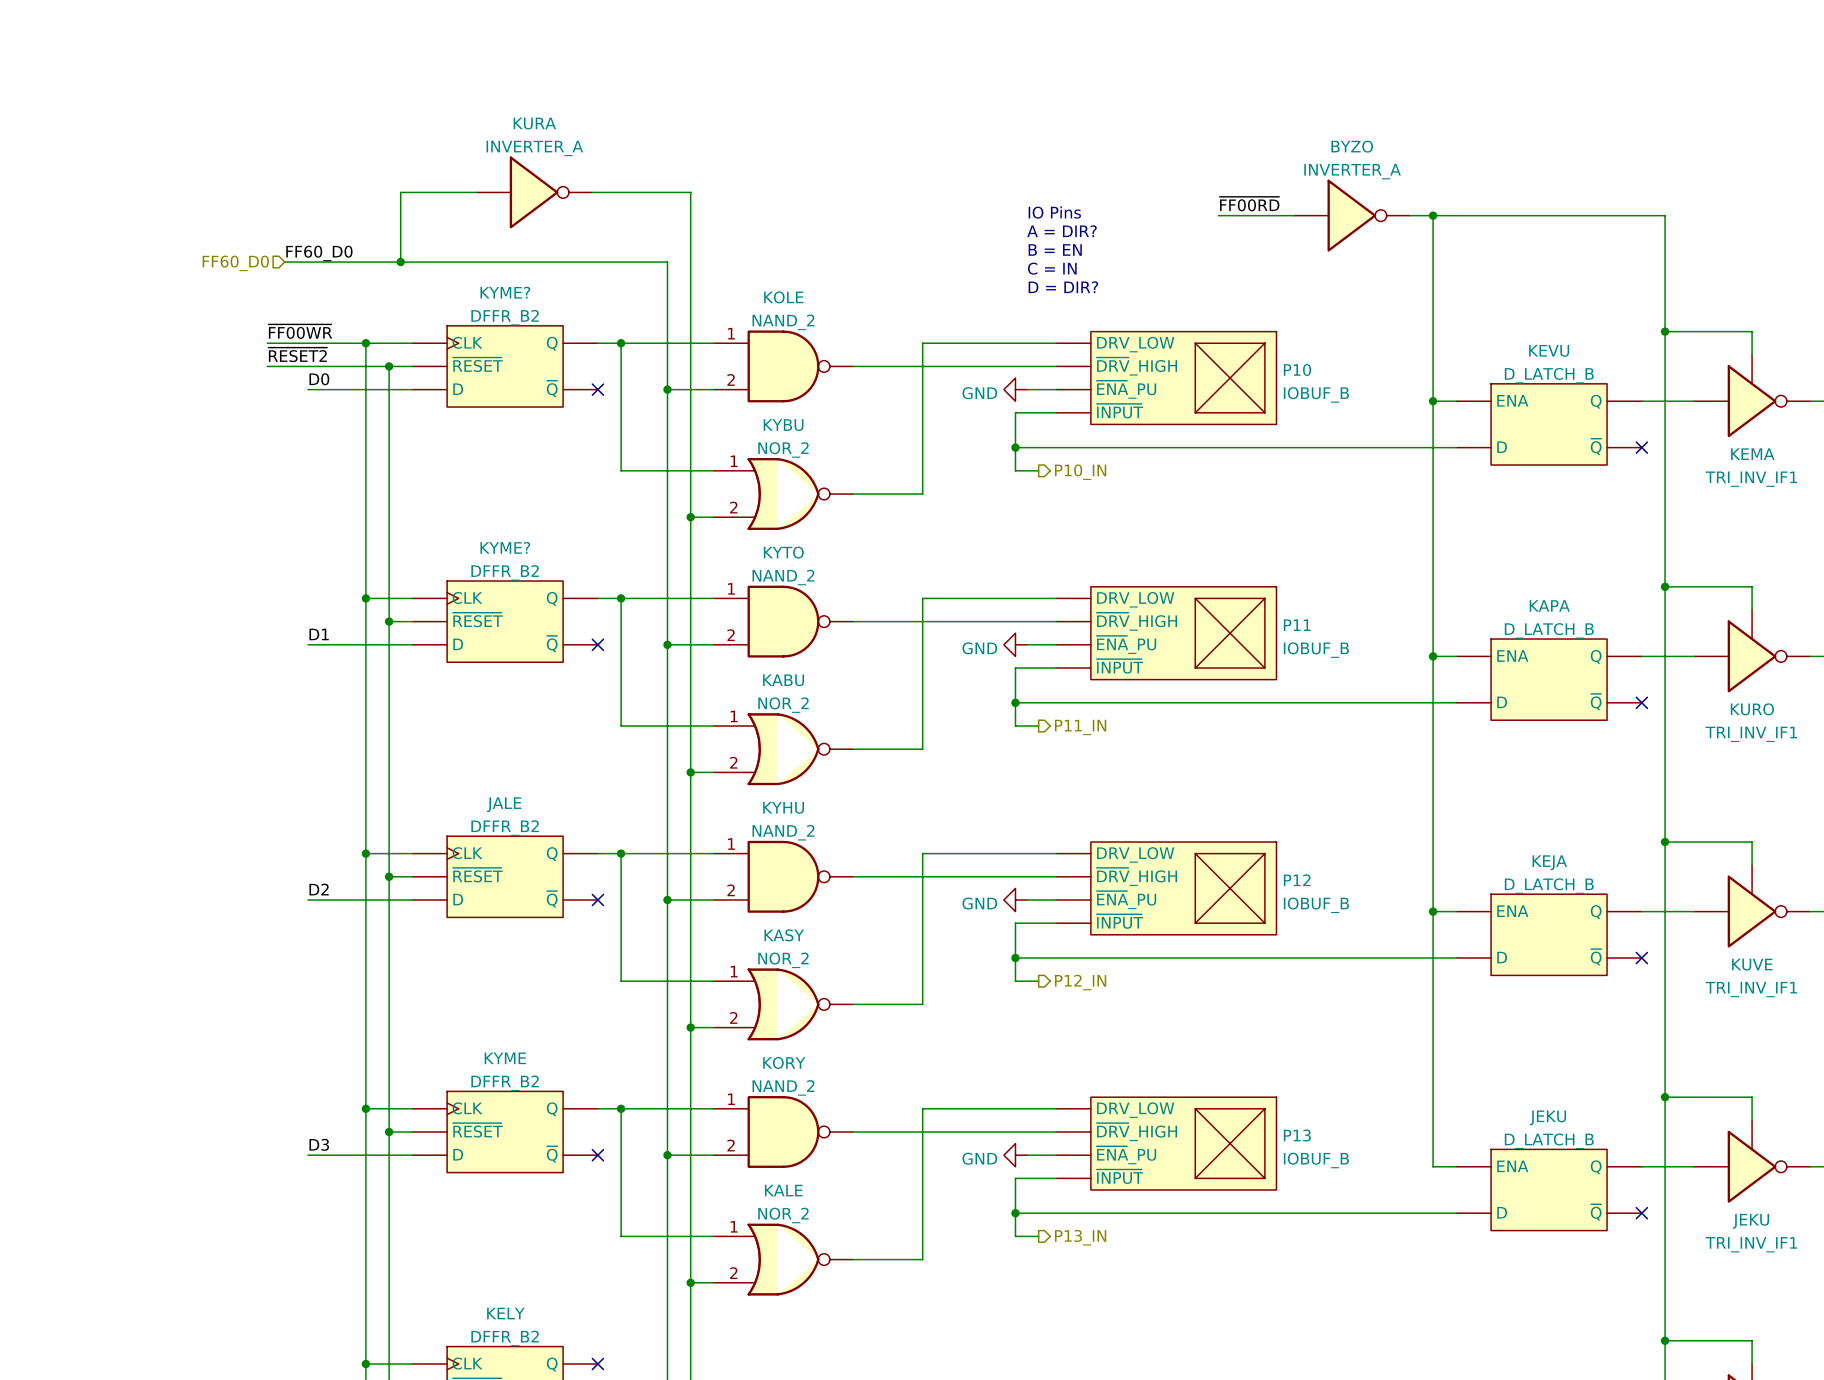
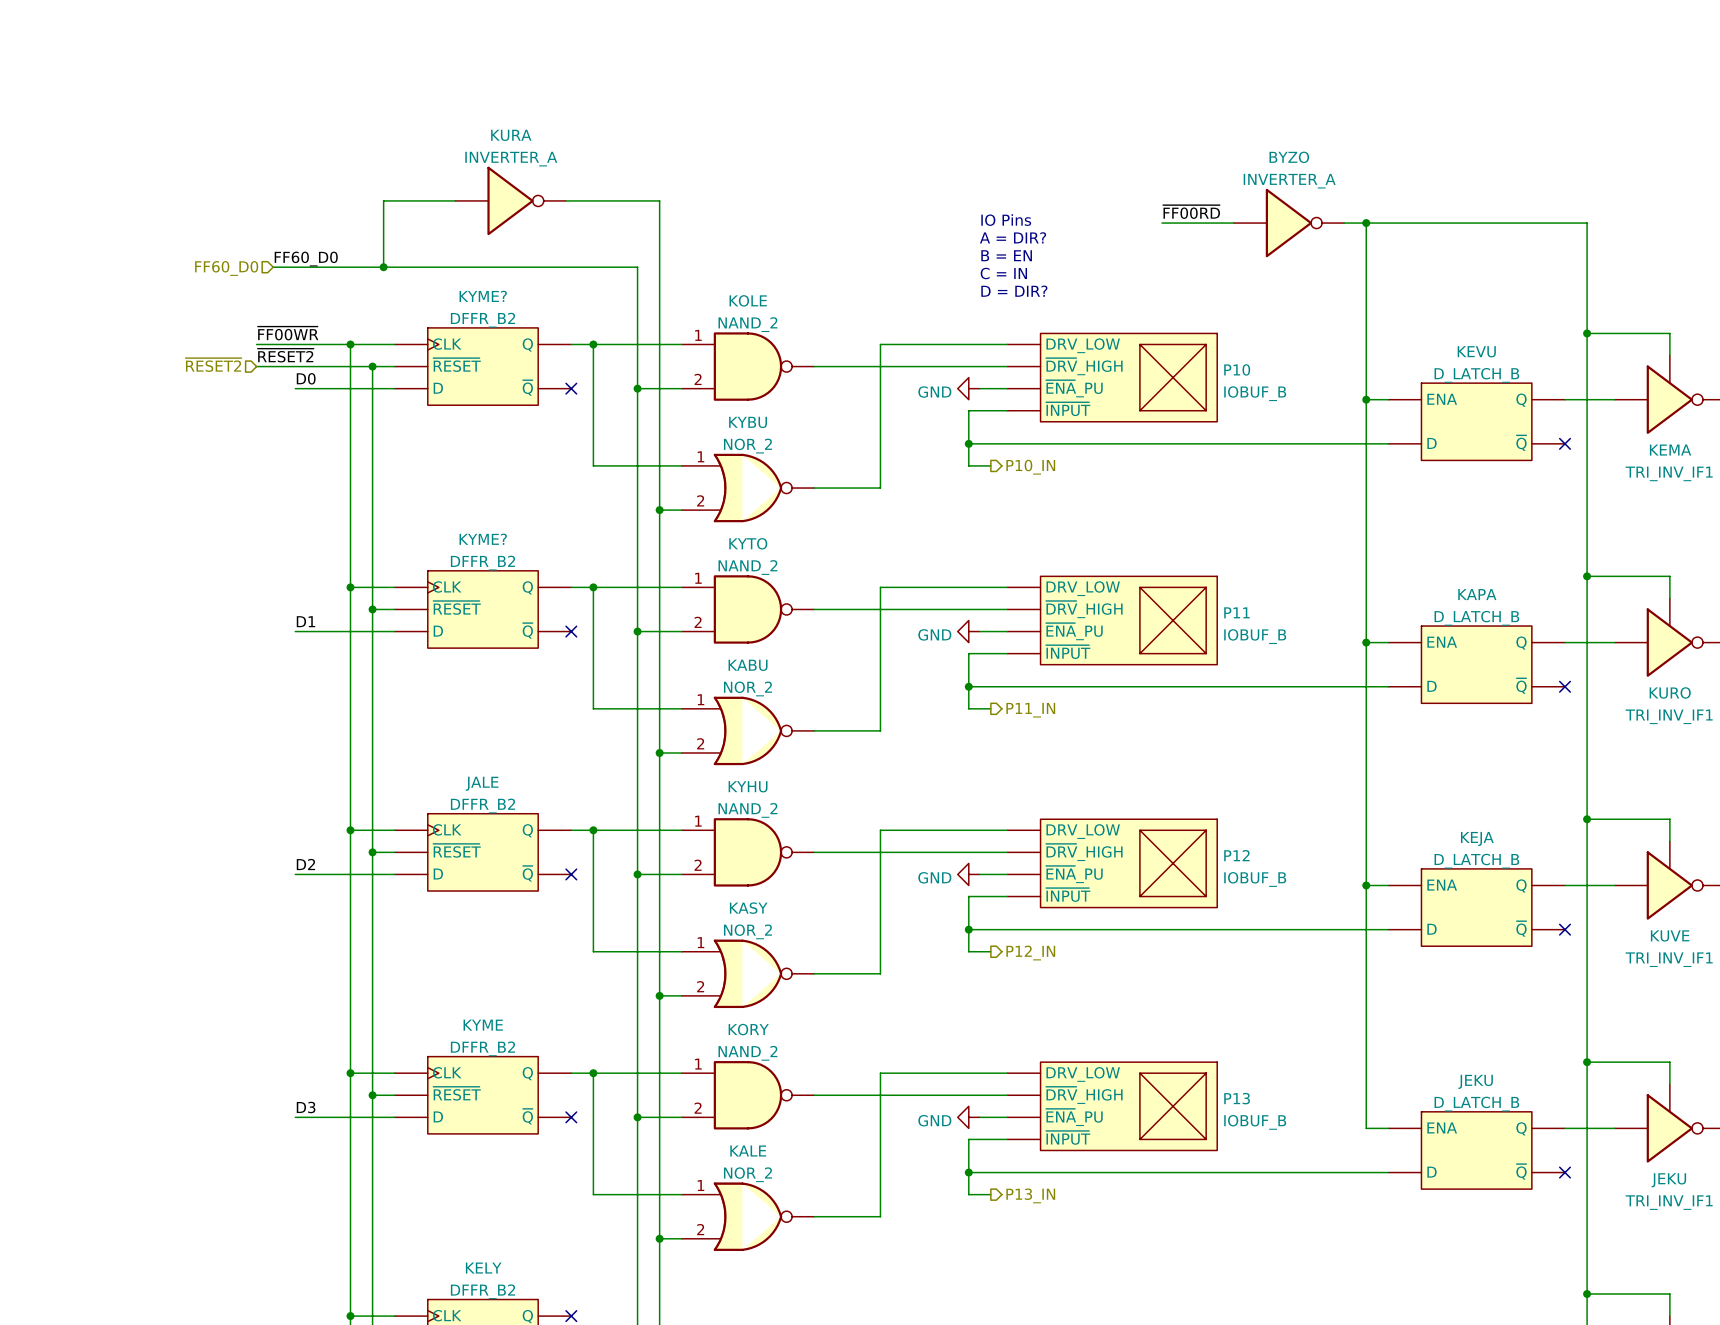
hierarchical label: none -> ~{RESET2} (213, 364)

